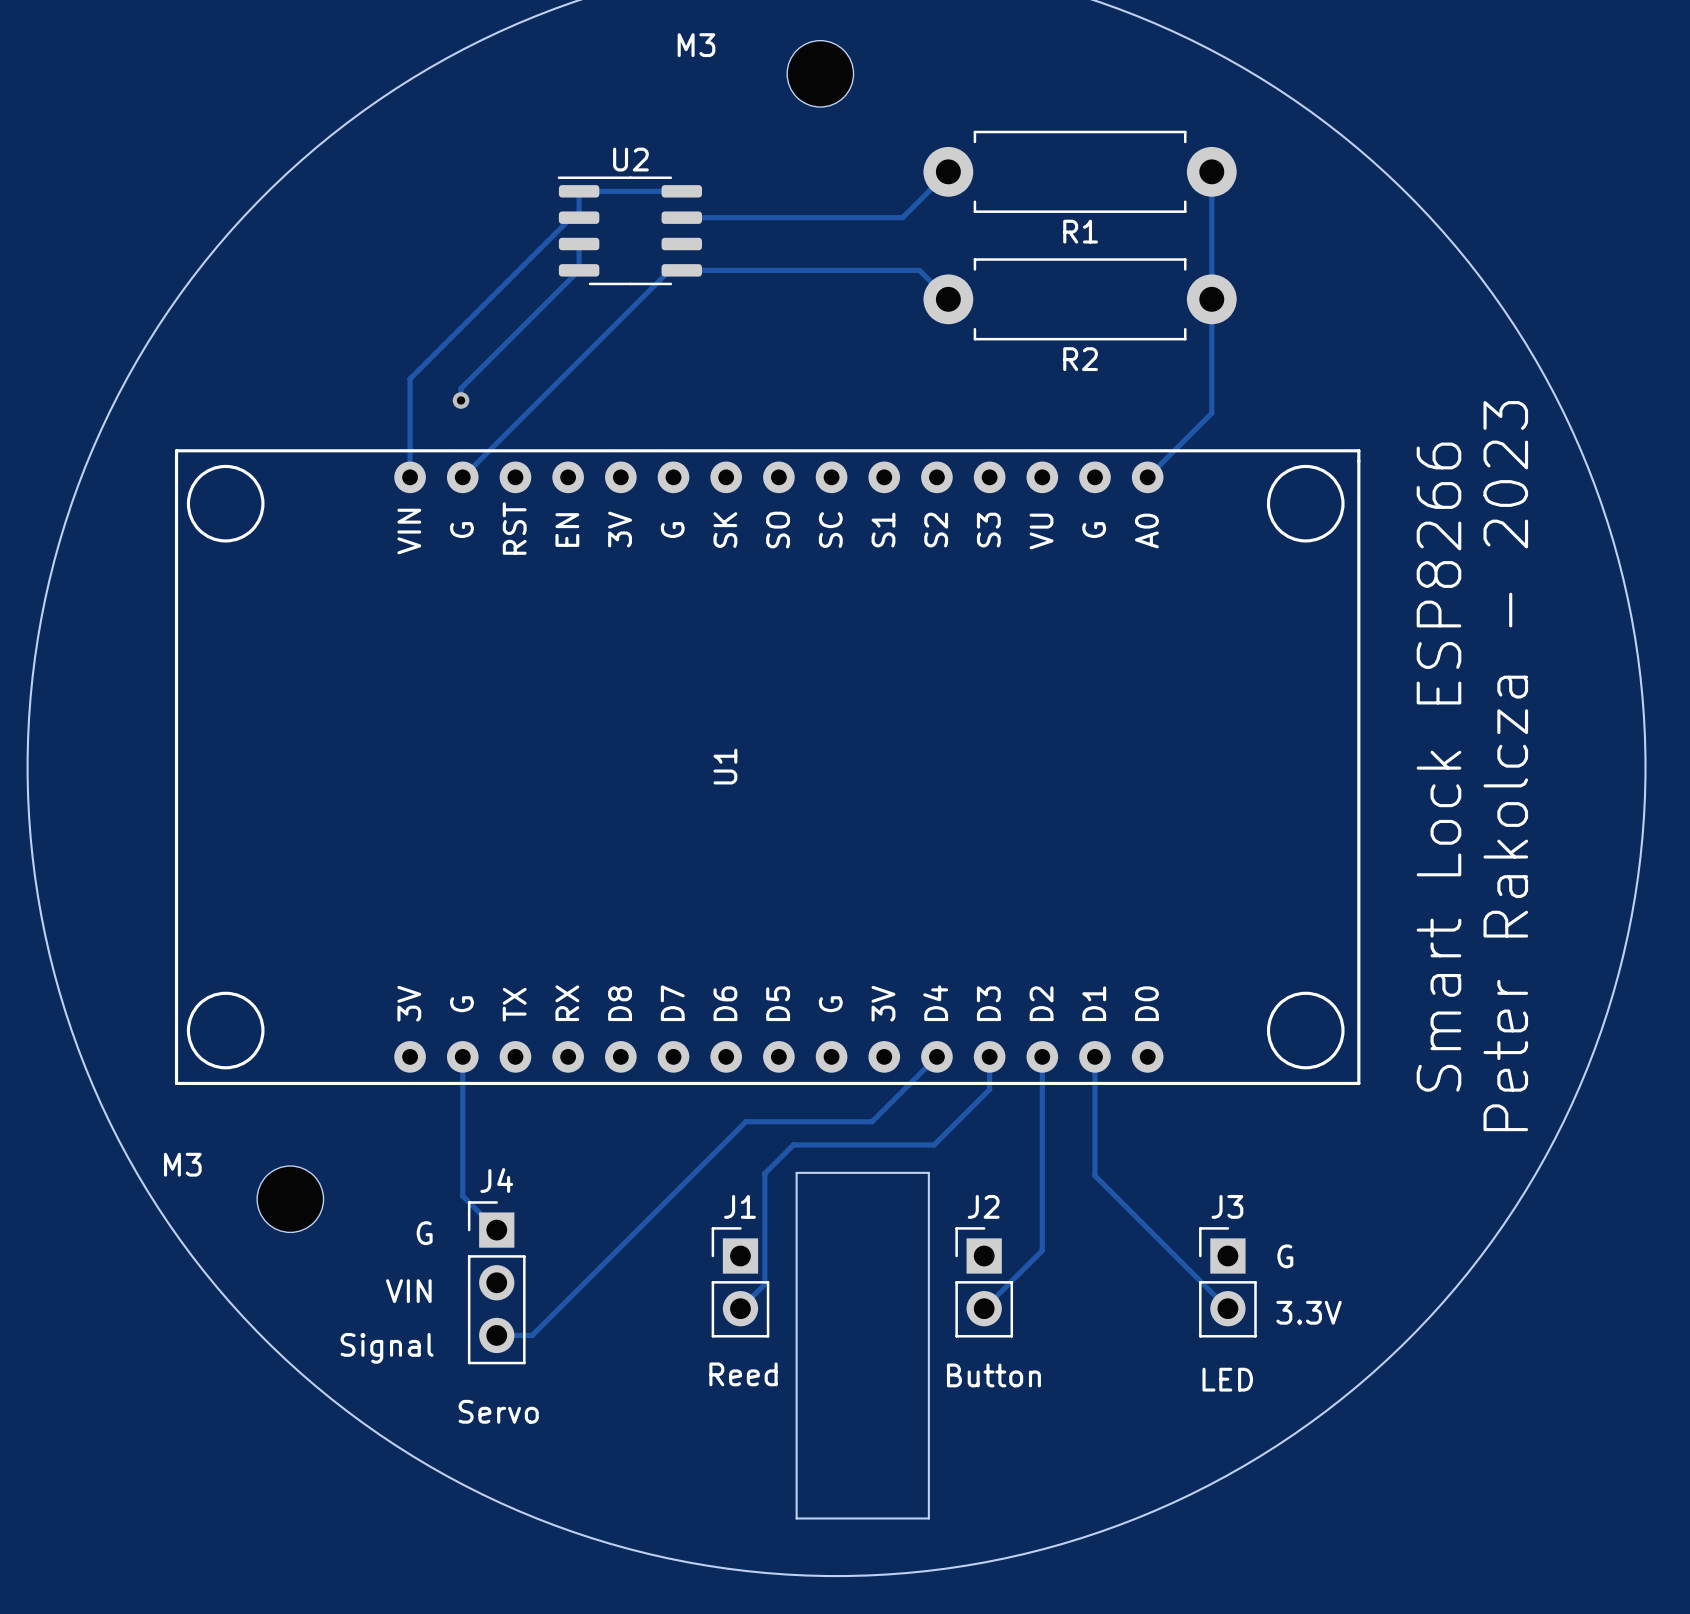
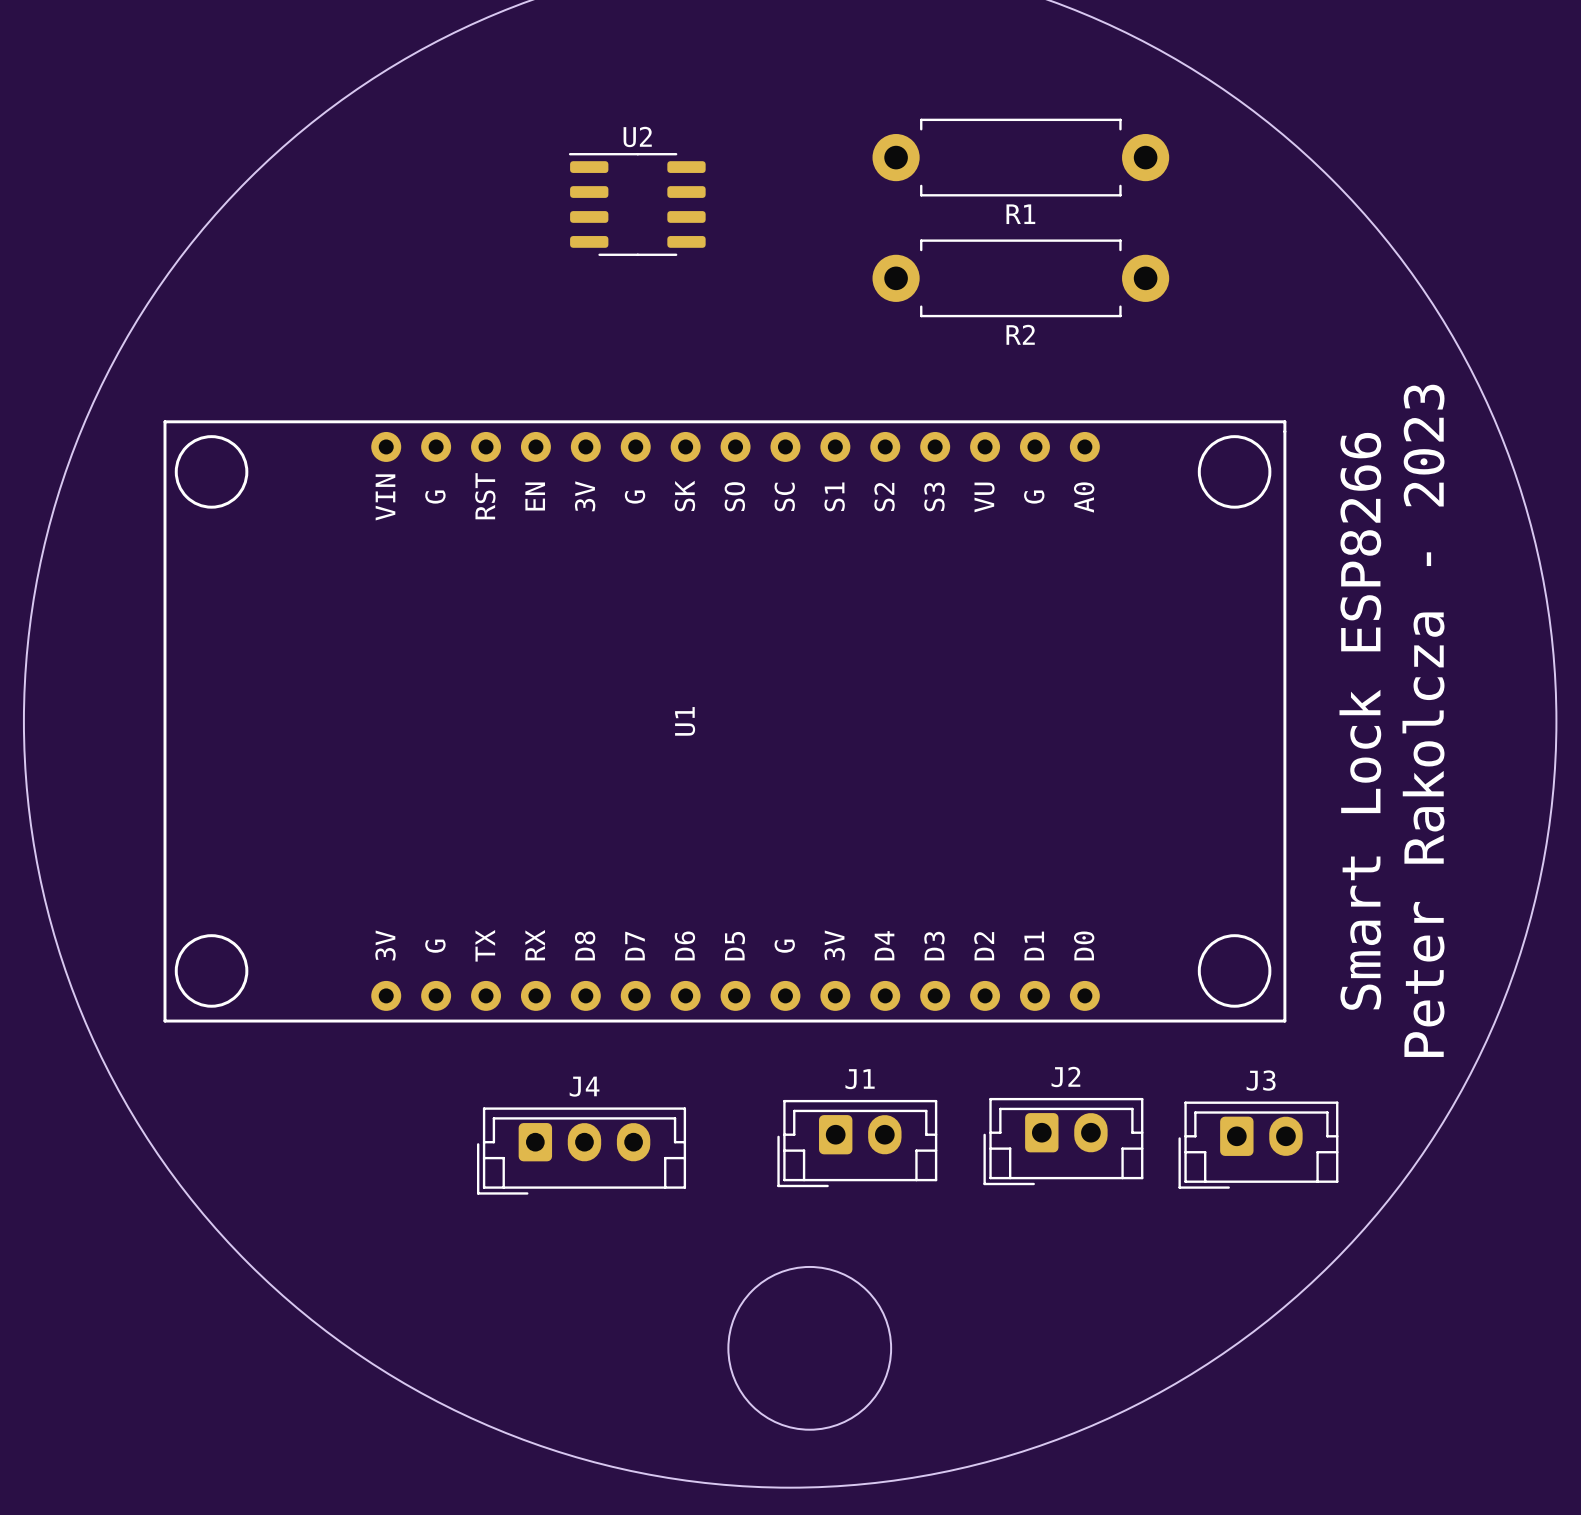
M3: (820, 73) -> none
track: (948, 171) (902, 217) (681, 217) -> none
track: (1211, 171) (1211, 413) (1147, 477) -> none
track: (681, 191) (579, 191) (579, 217) (571, 217) (410, 378) (410, 477) -> none
U2 position: (629, 230) -> (637, 204)
track: (579, 244) (579, 270) (461, 388) (461, 400) -> none
track: (948, 299) (919, 270) (669, 270) (462, 477) -> none
via: (461, 400) -> none
track: (462, 1056) (462, 1196) (496, 1230) -> none
track: (936, 1056) (872, 1121) (745, 1121) (532, 1335) (496, 1335) -> none
track: (989, 1056) (989, 1089) (934, 1144) (793, 1144) (764, 1173) (764, 1284) (740, 1308) -> none
track: (1042, 1056) (1042, 1250) (984, 1308) -> none
track: (1095, 1056) (1095, 1175) (1227, 1308) -> none
board edge: (796, 1172) (928, 1172) (928, 1518) (796, 1518) (796, 1172) -> none
M3: (290, 1199) -> none
J4 footprint: [467, 1201, 526, 1365] -> [477, 1107, 687, 1195]
J1 footprint: [711, 1227, 770, 1338] -> [777, 1099, 938, 1188]
J2 footprint: [955, 1227, 1014, 1338] -> [983, 1097, 1144, 1186]
J3 footprint: [1199, 1227, 1257, 1338] -> [1178, 1101, 1339, 1189]
text: G (424, 1233) -> none
text: G (1285, 1256) -> none
text: VIN (408, 1291) -> none
text: 3.3V (1309, 1312) -> none
round board edge: none -> [727, 1265, 893, 1431]
text: Signal (387, 1348) -> none
text: Reed (743, 1374) -> none
text: Button (993, 1375) -> none
text: LED (1227, 1379) -> none
text: Servo (498, 1411) -> none

